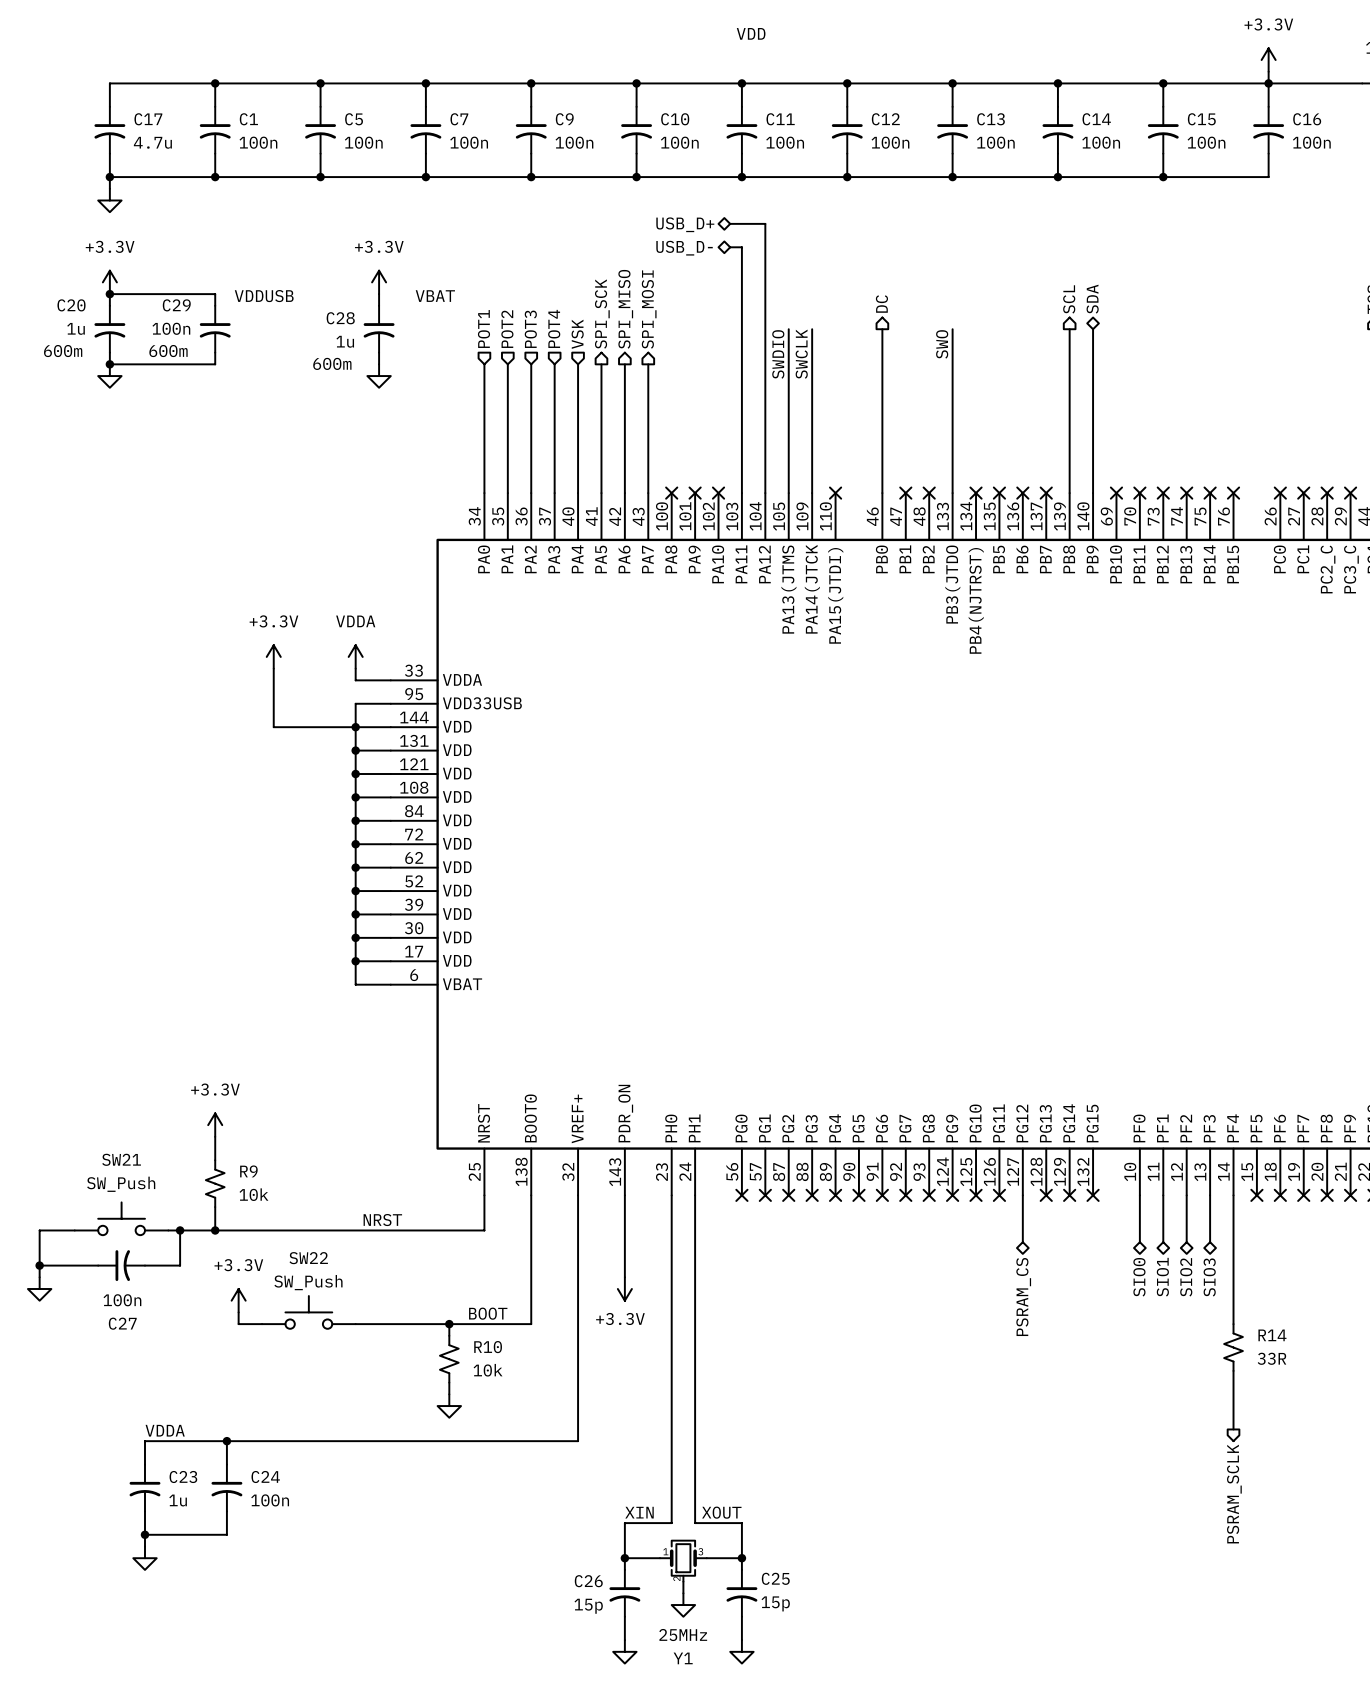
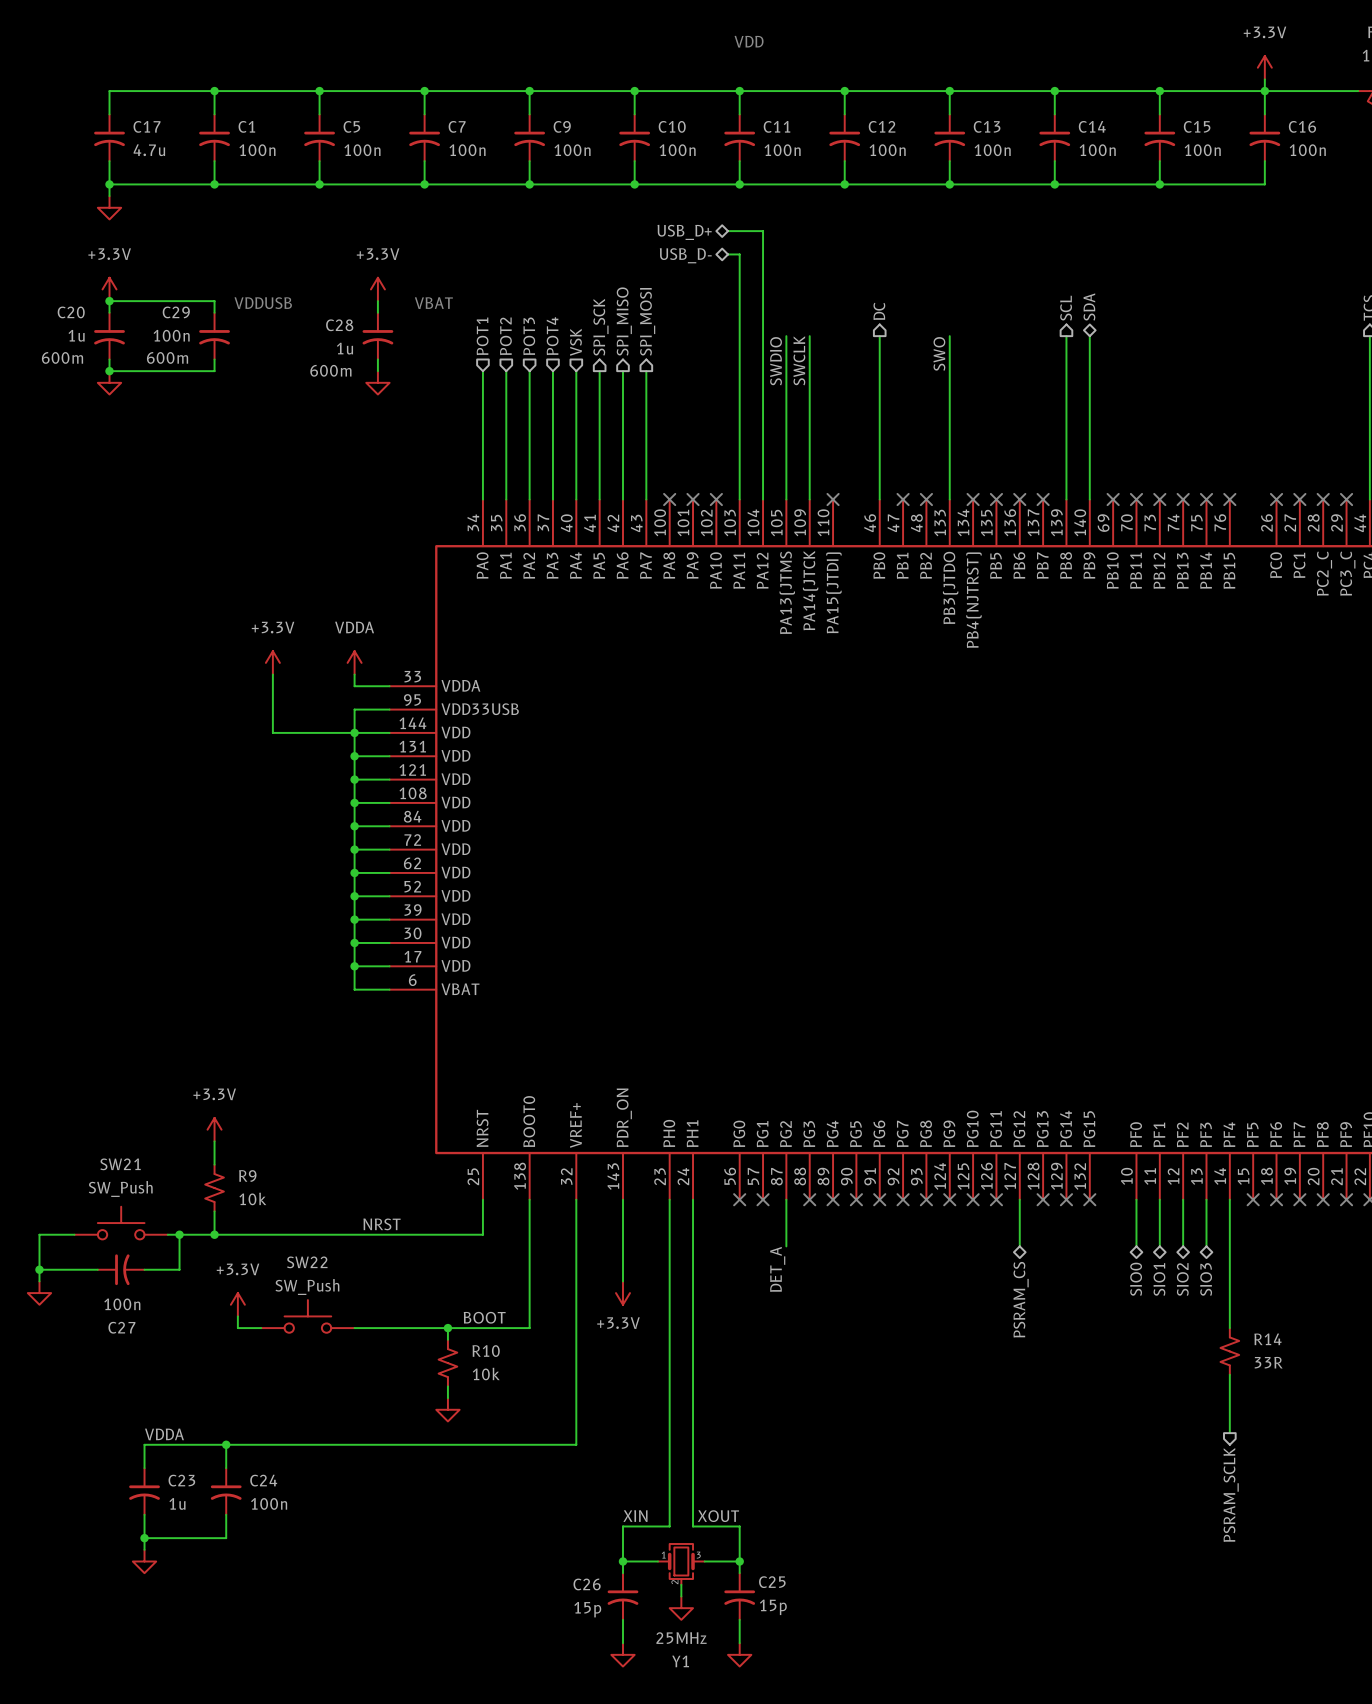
wire: none -> (786, 1199) (786, 1246)
no-connect mark: (788, 1195) -> none
label: none -> DET_A (777, 1269)

